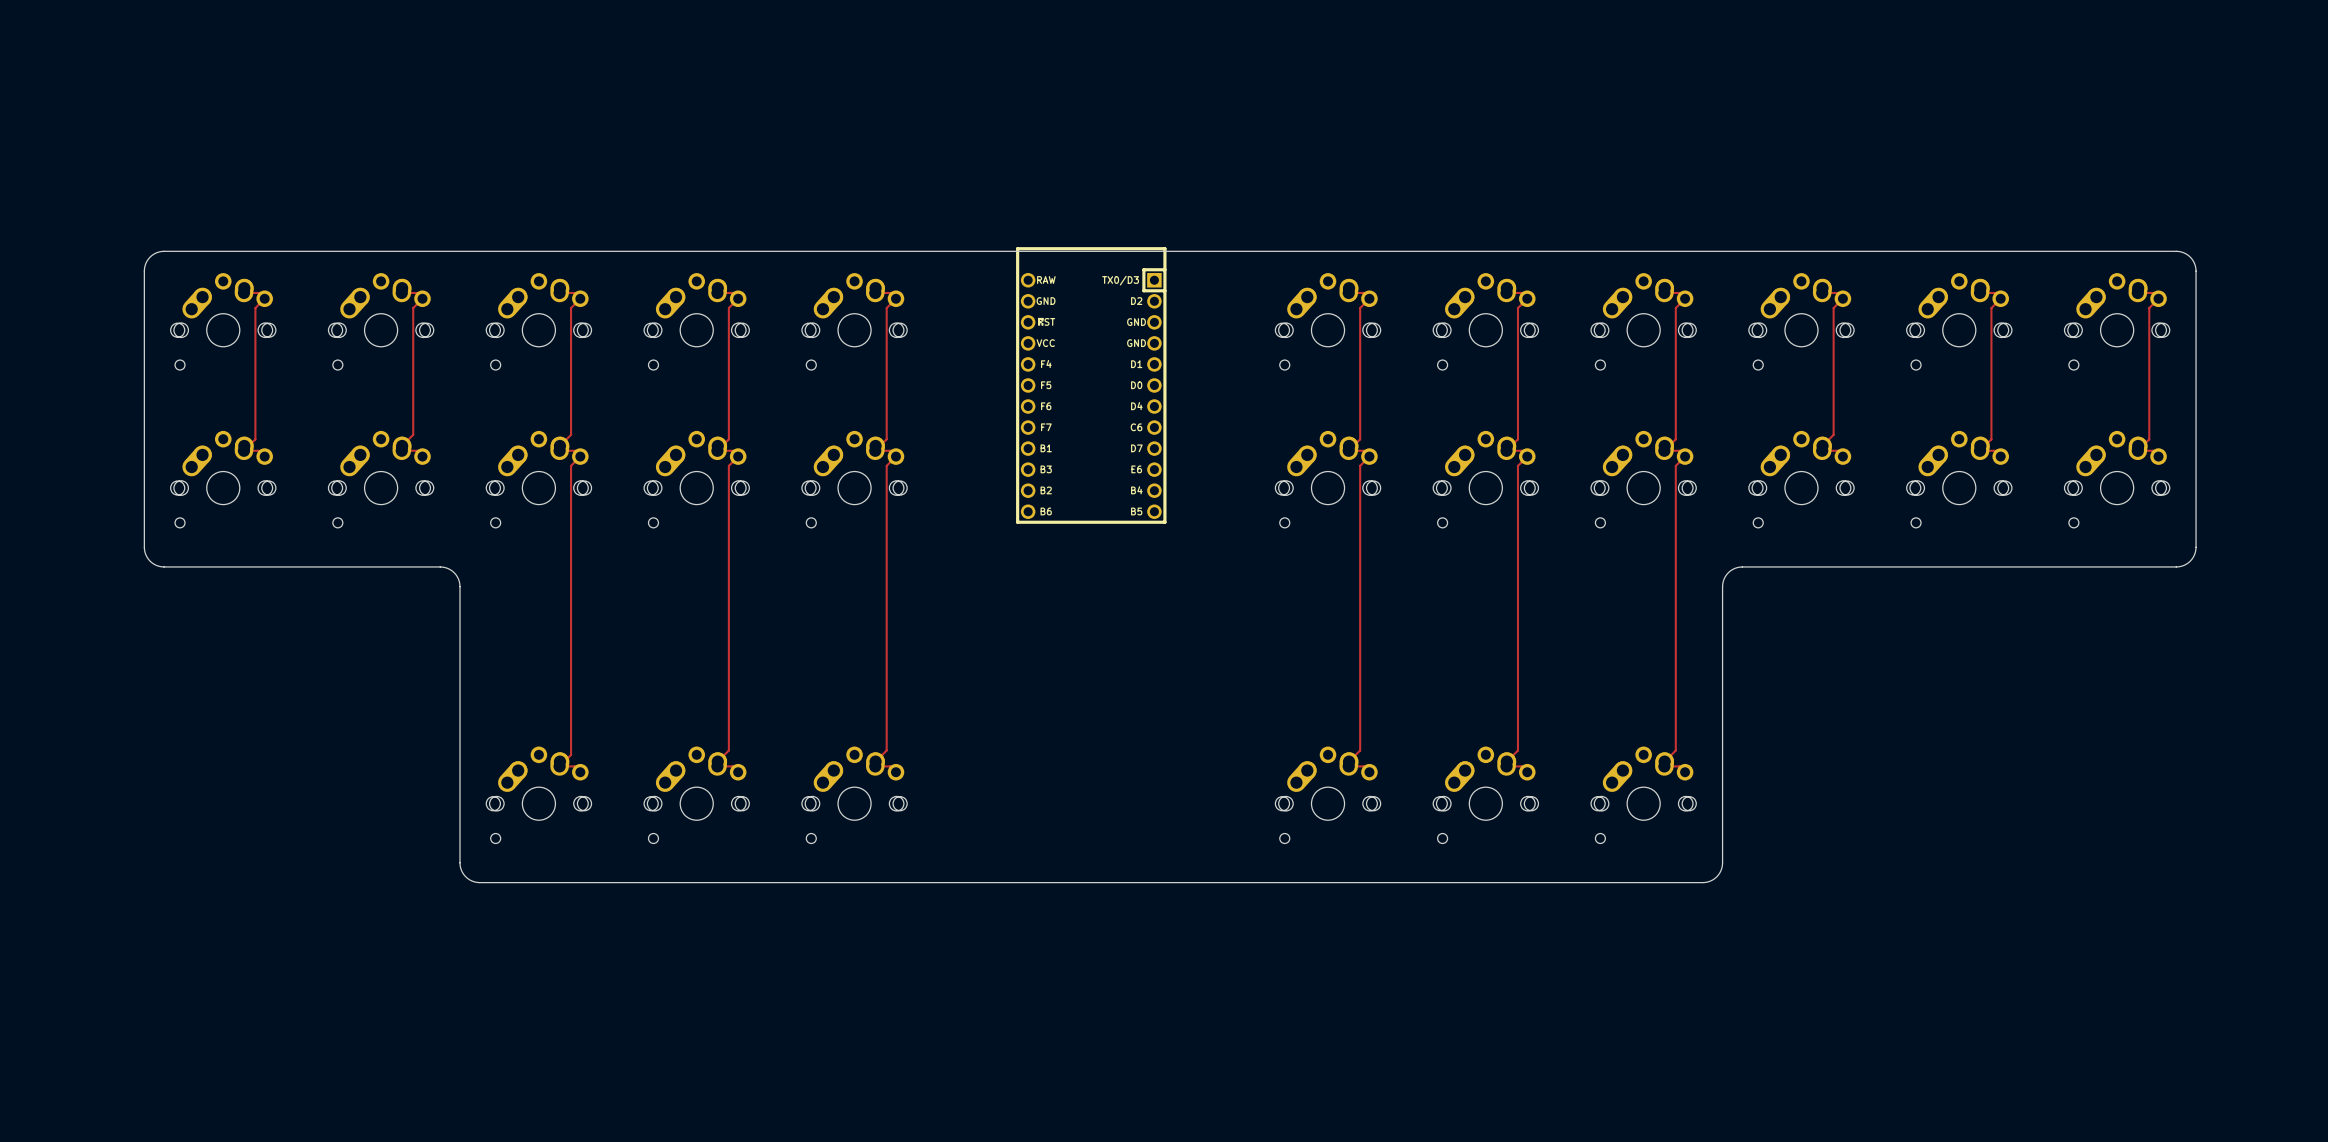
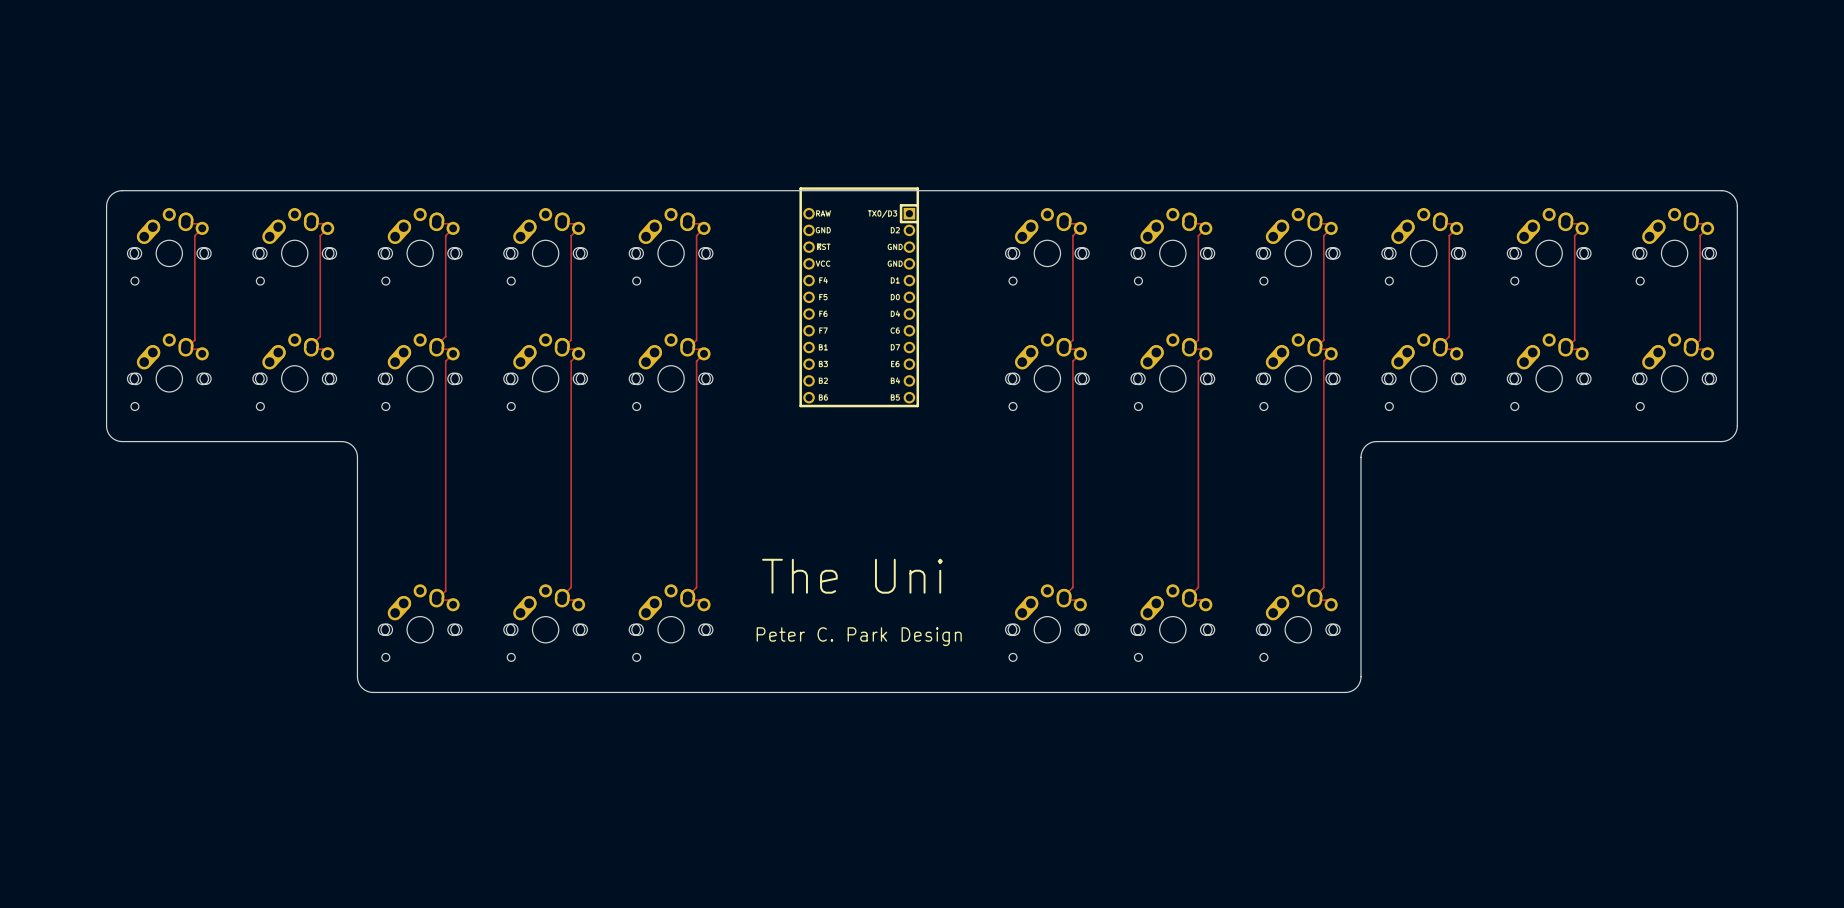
text: none -> The Uni (852, 576)
text: none -> Peter C. Park Design (859, 636)

